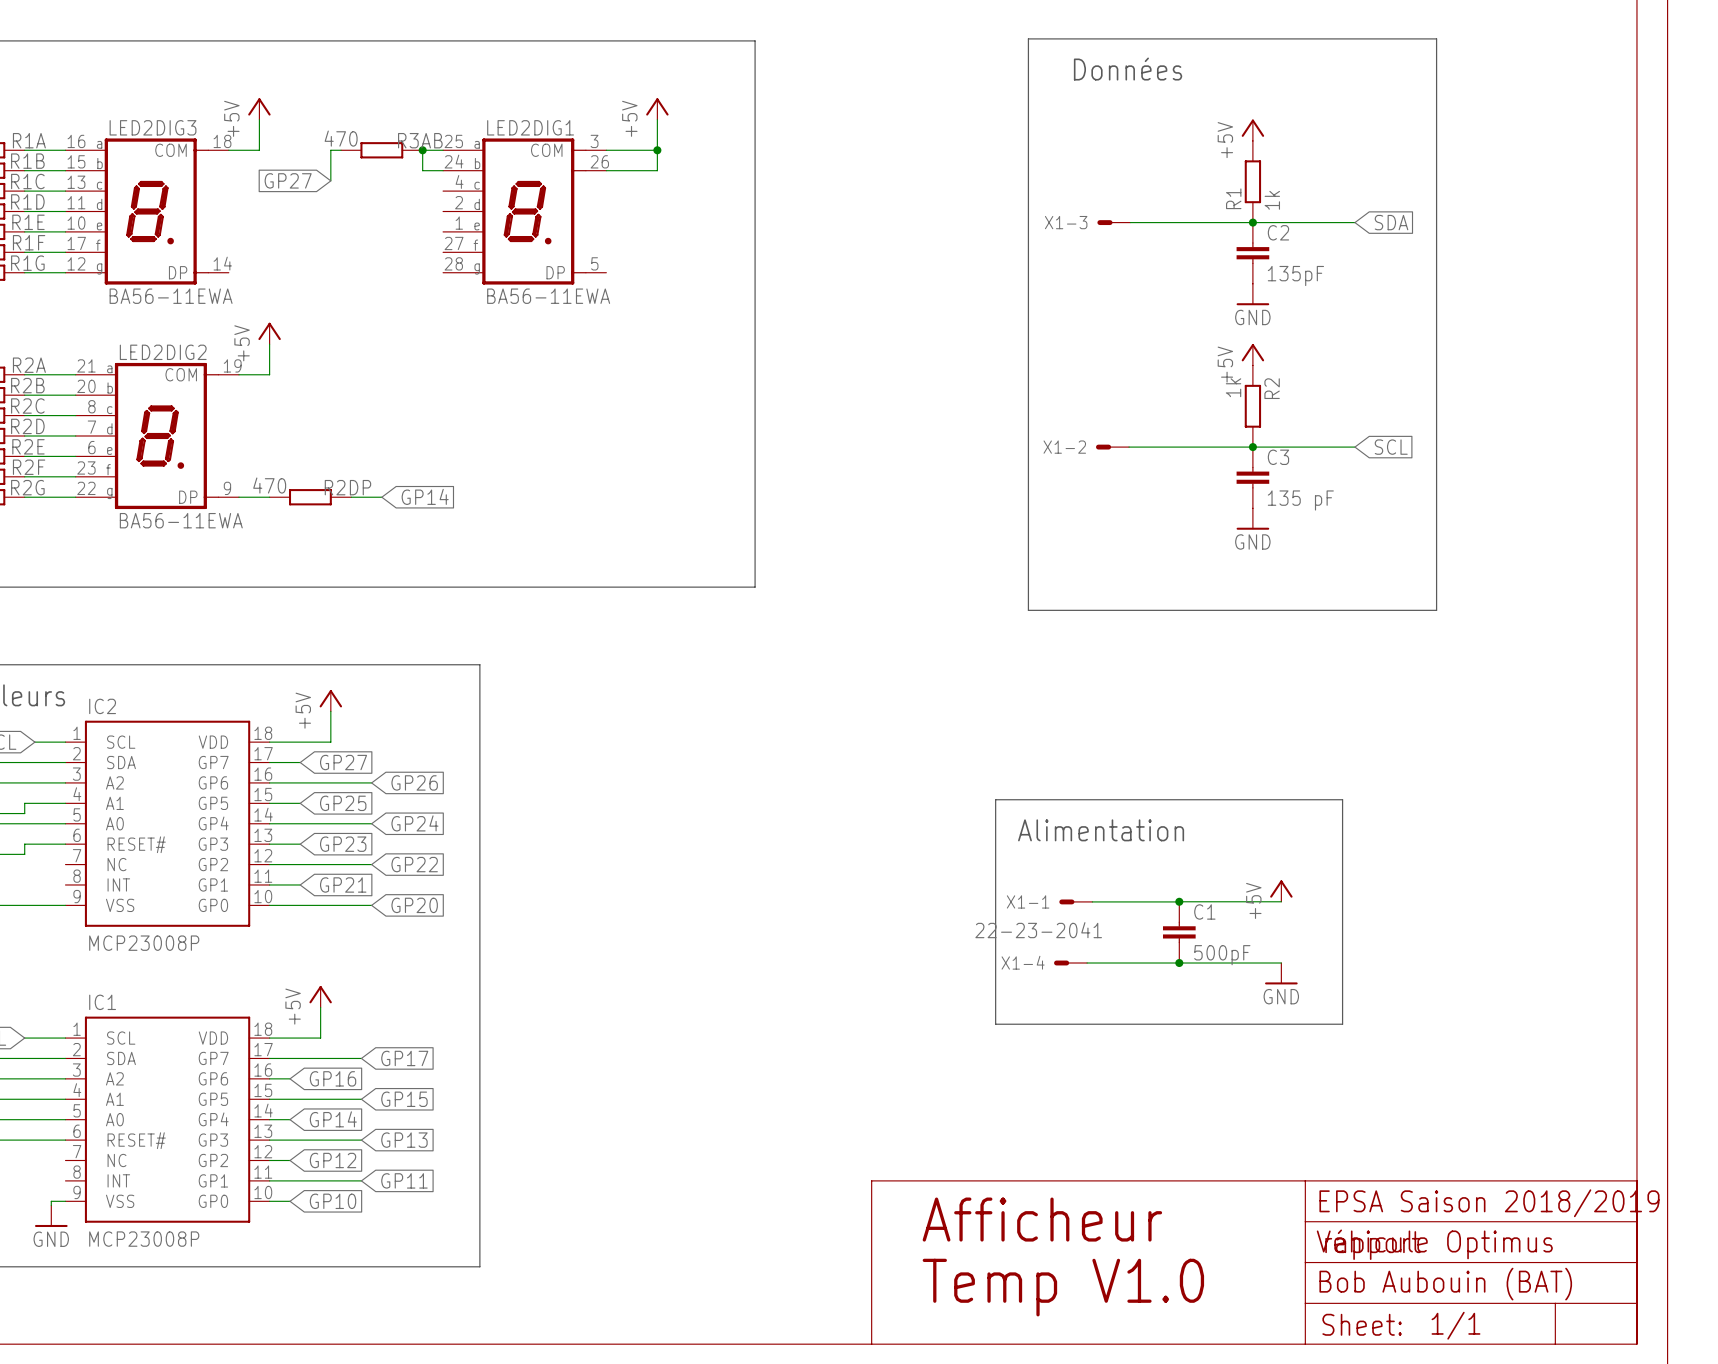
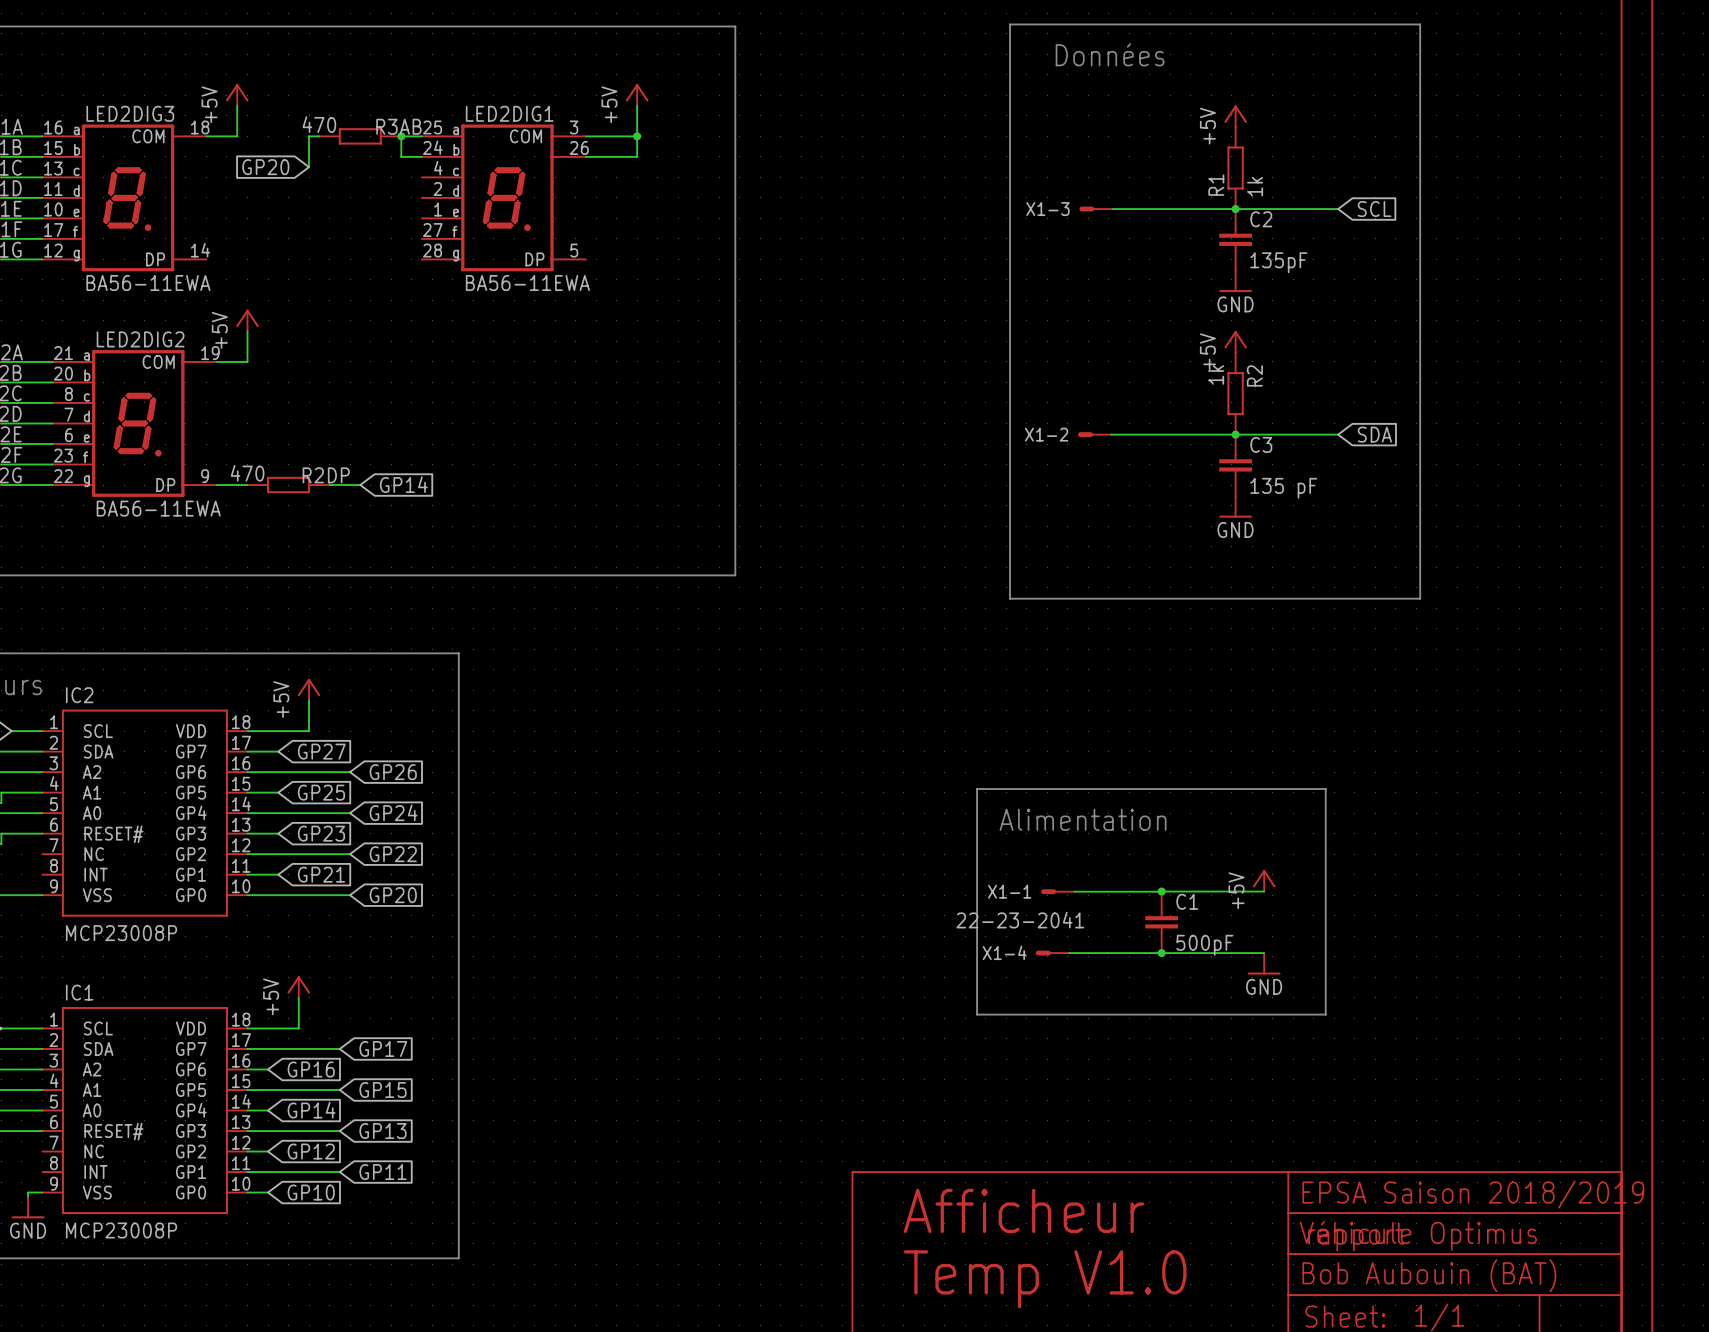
global label: GP27 (288, 180) -> GP20 (265, 167)
global label: SDA (1391, 222) -> SCL (1374, 209)
global label: SCL (1391, 447) -> SDA (1374, 434)

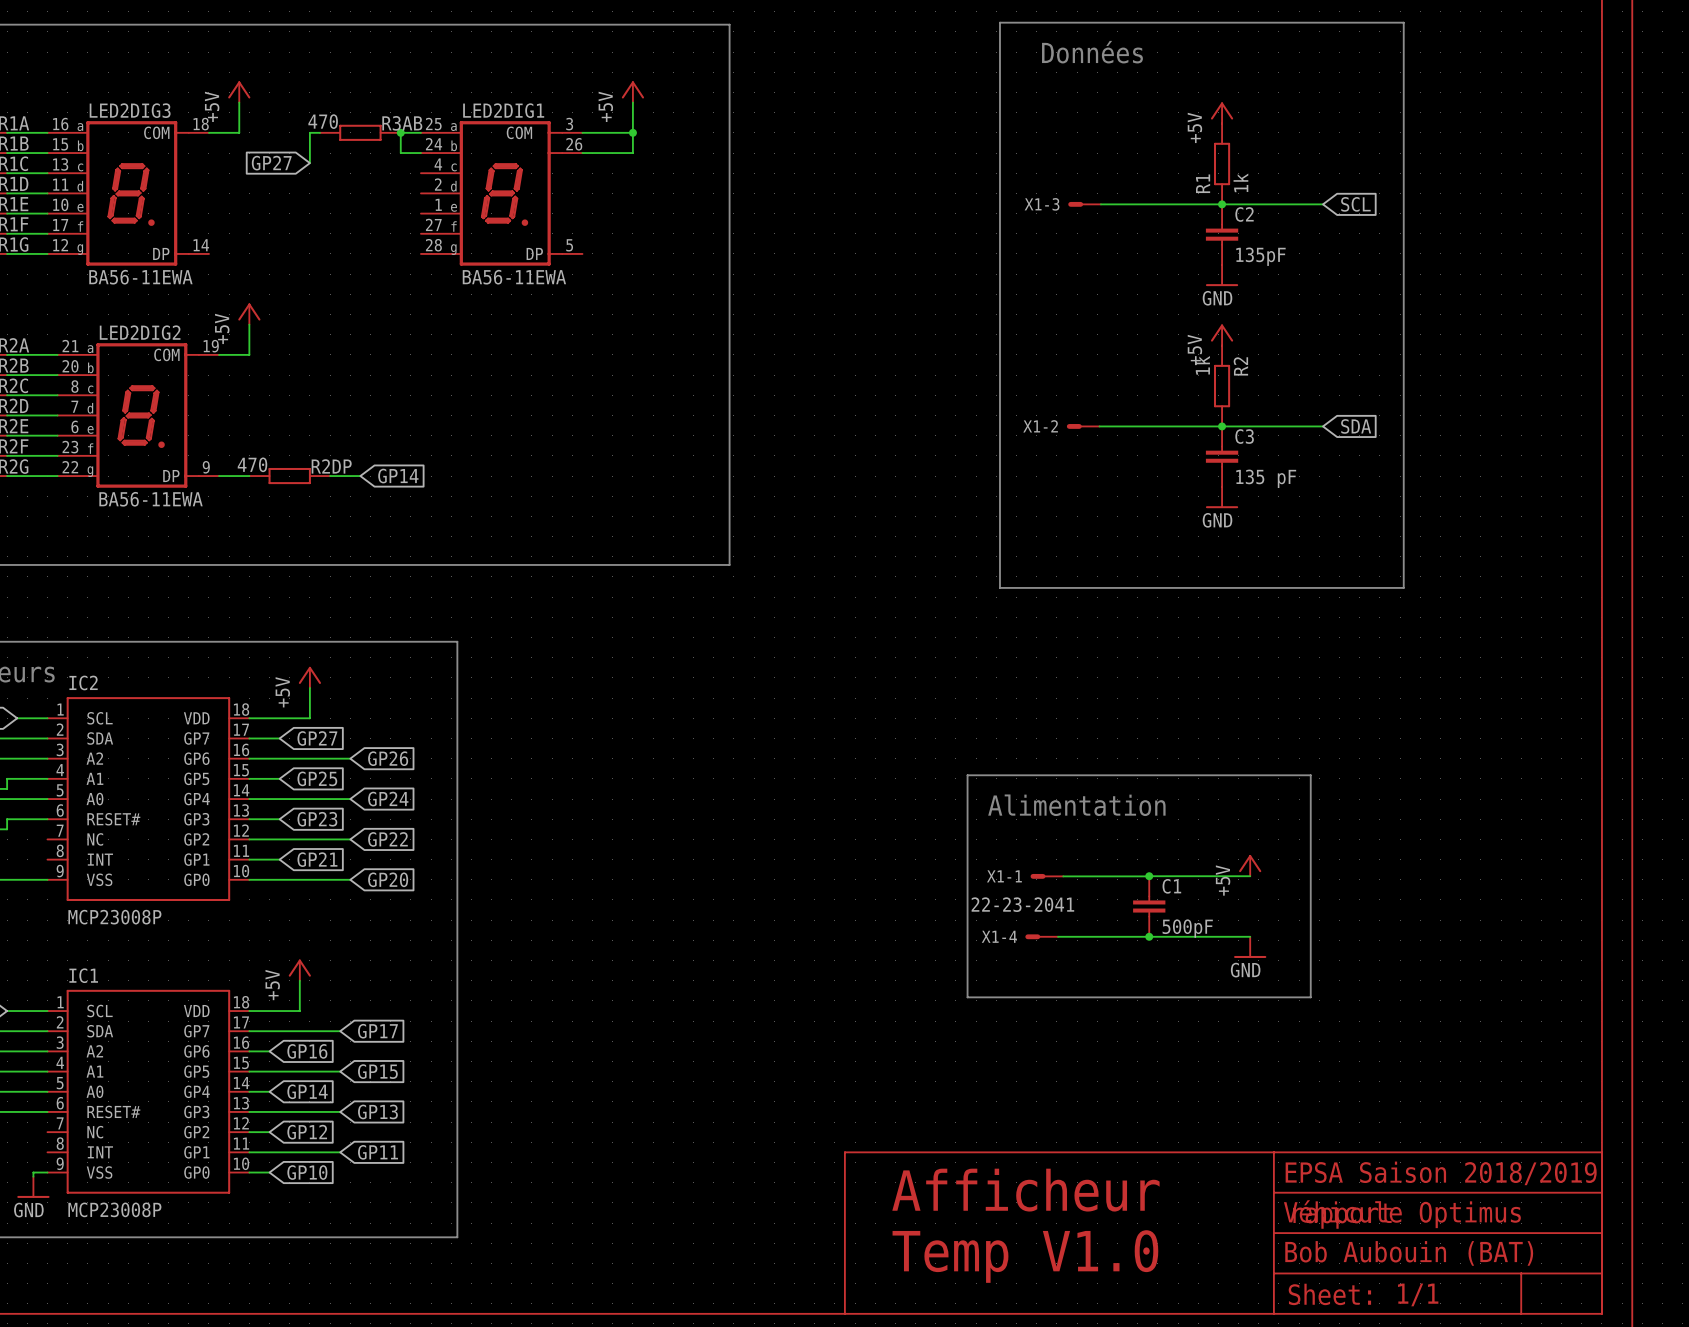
global label: GP20 (265, 167) -> GP27 (271, 163)

